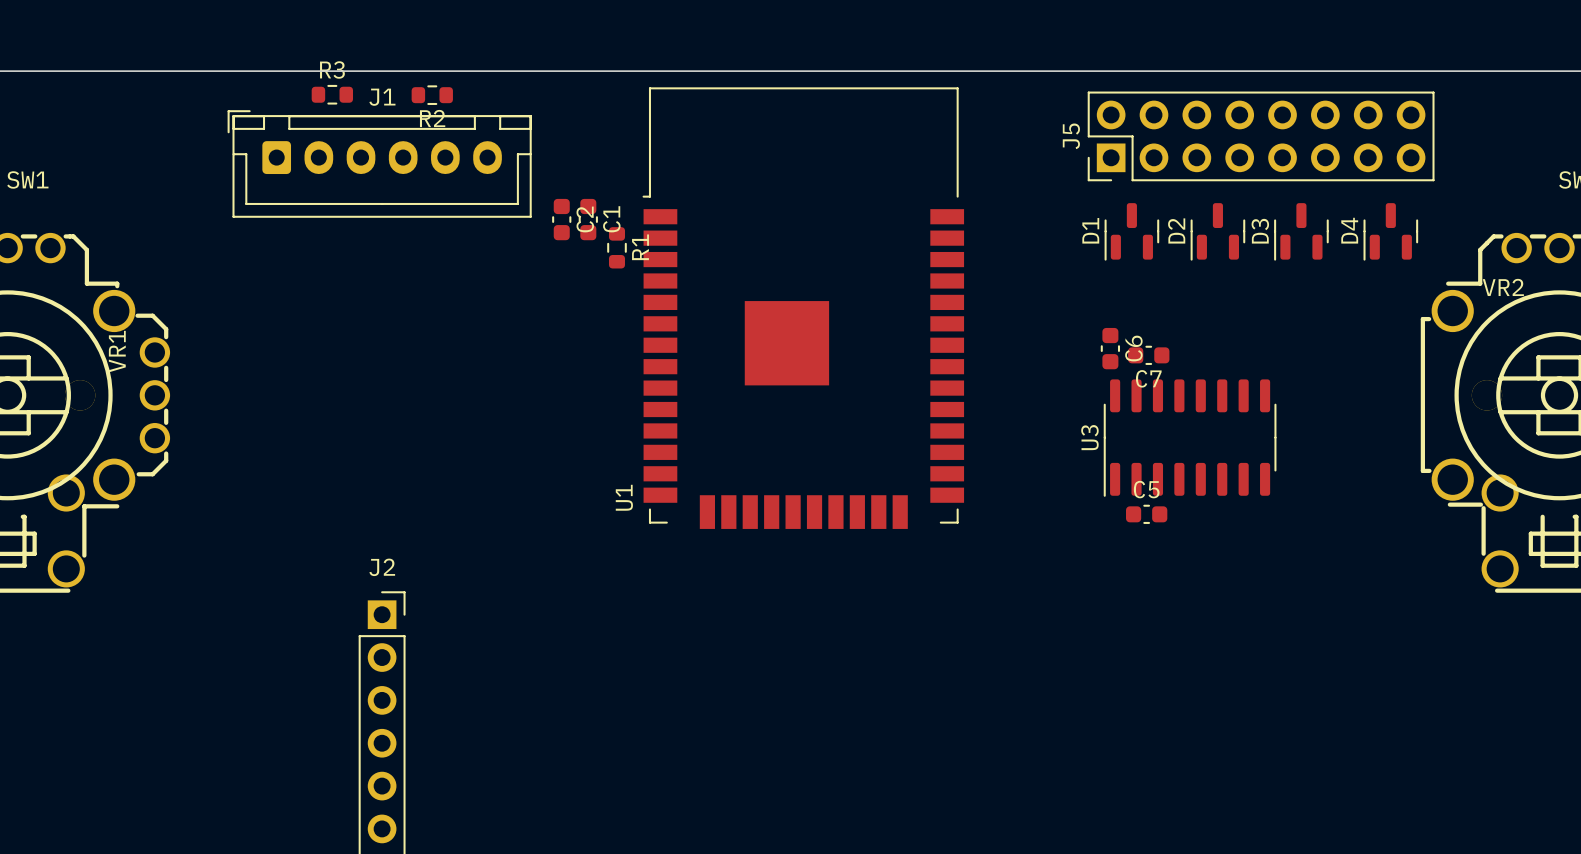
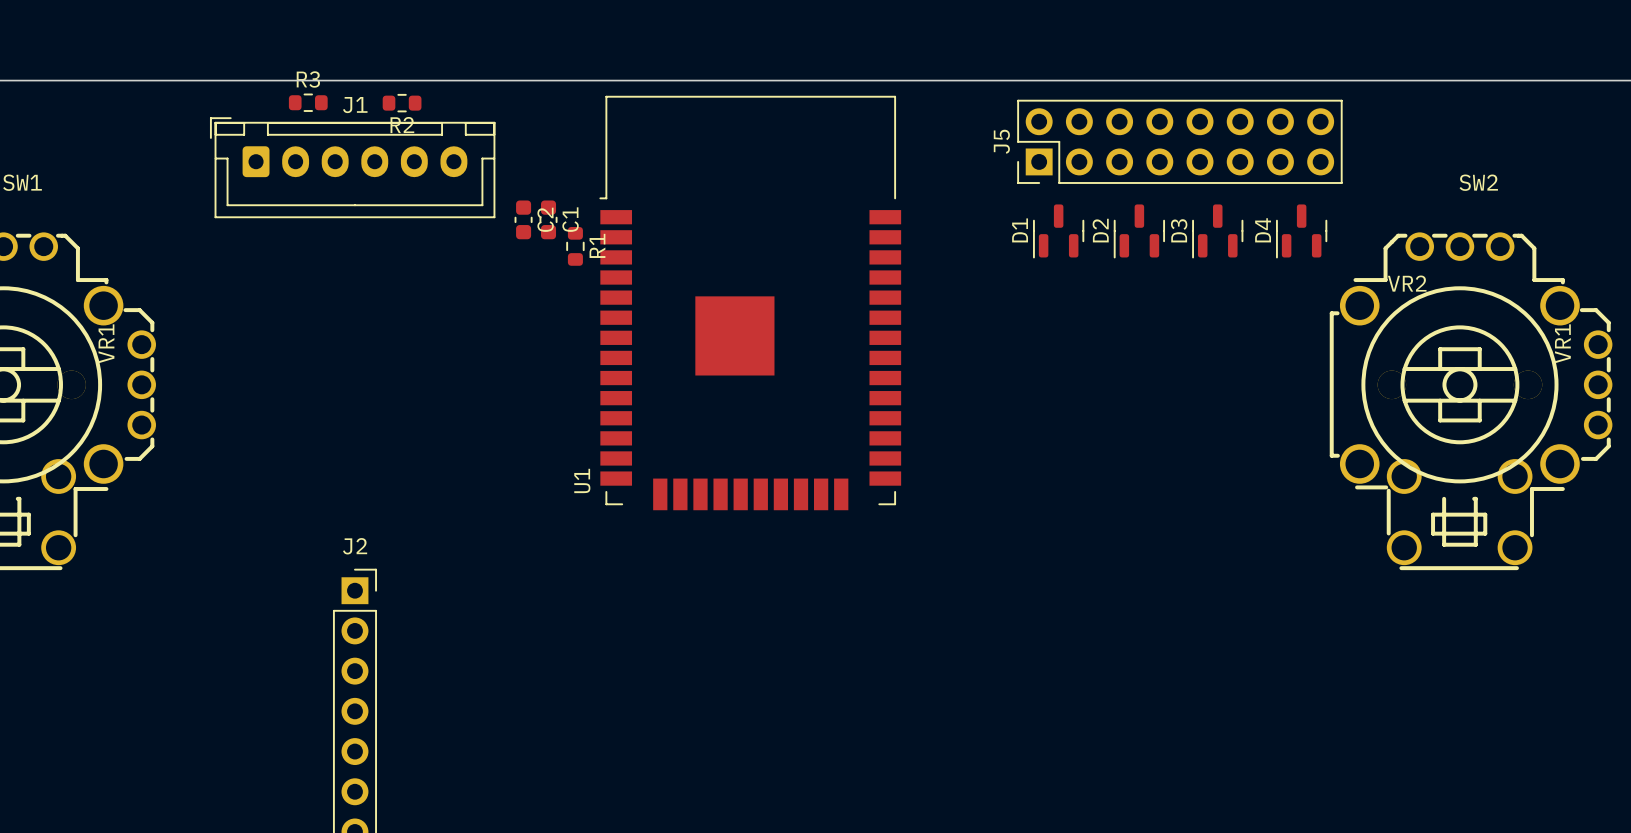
C6: (1110, 348) -> none
C7: (1148, 355) -> none
U3: (1190, 438) -> none
C5: (1146, 514) -> none

